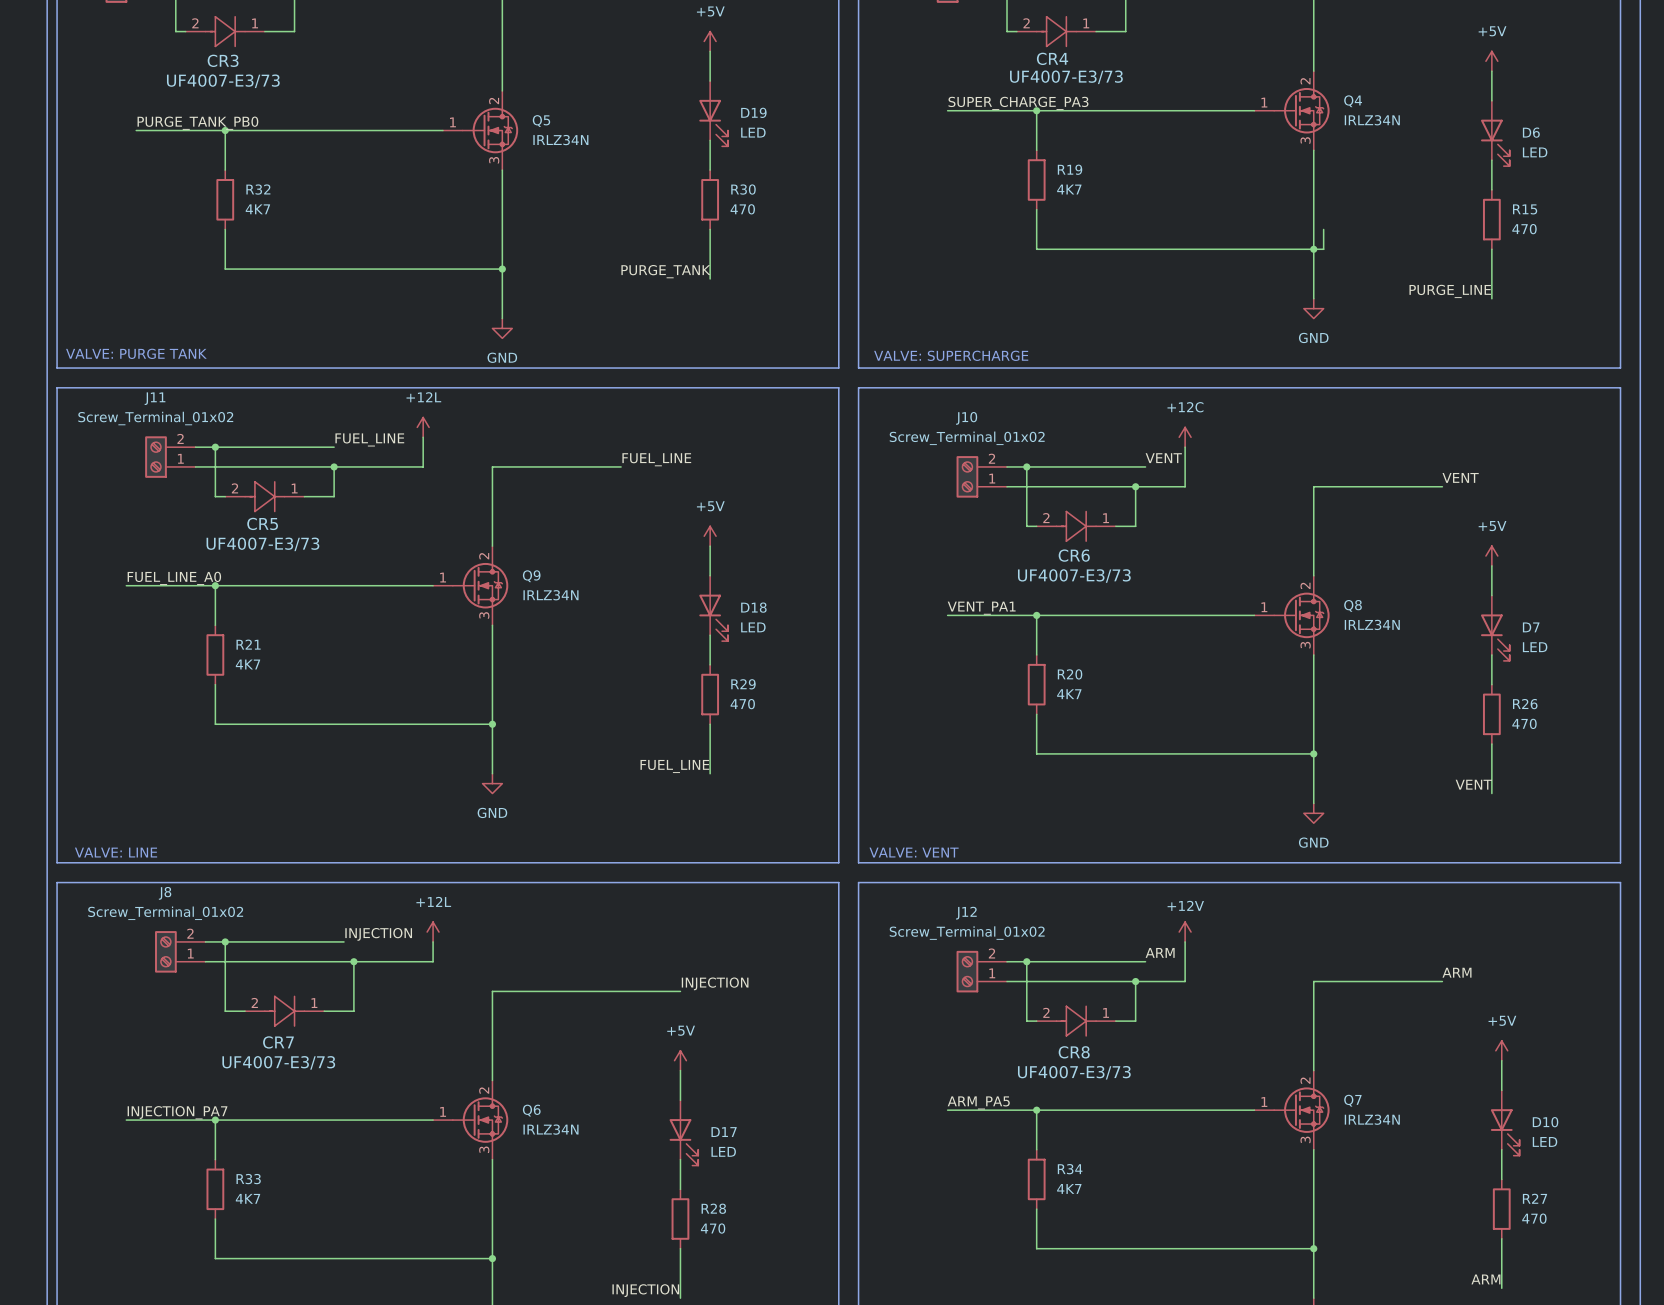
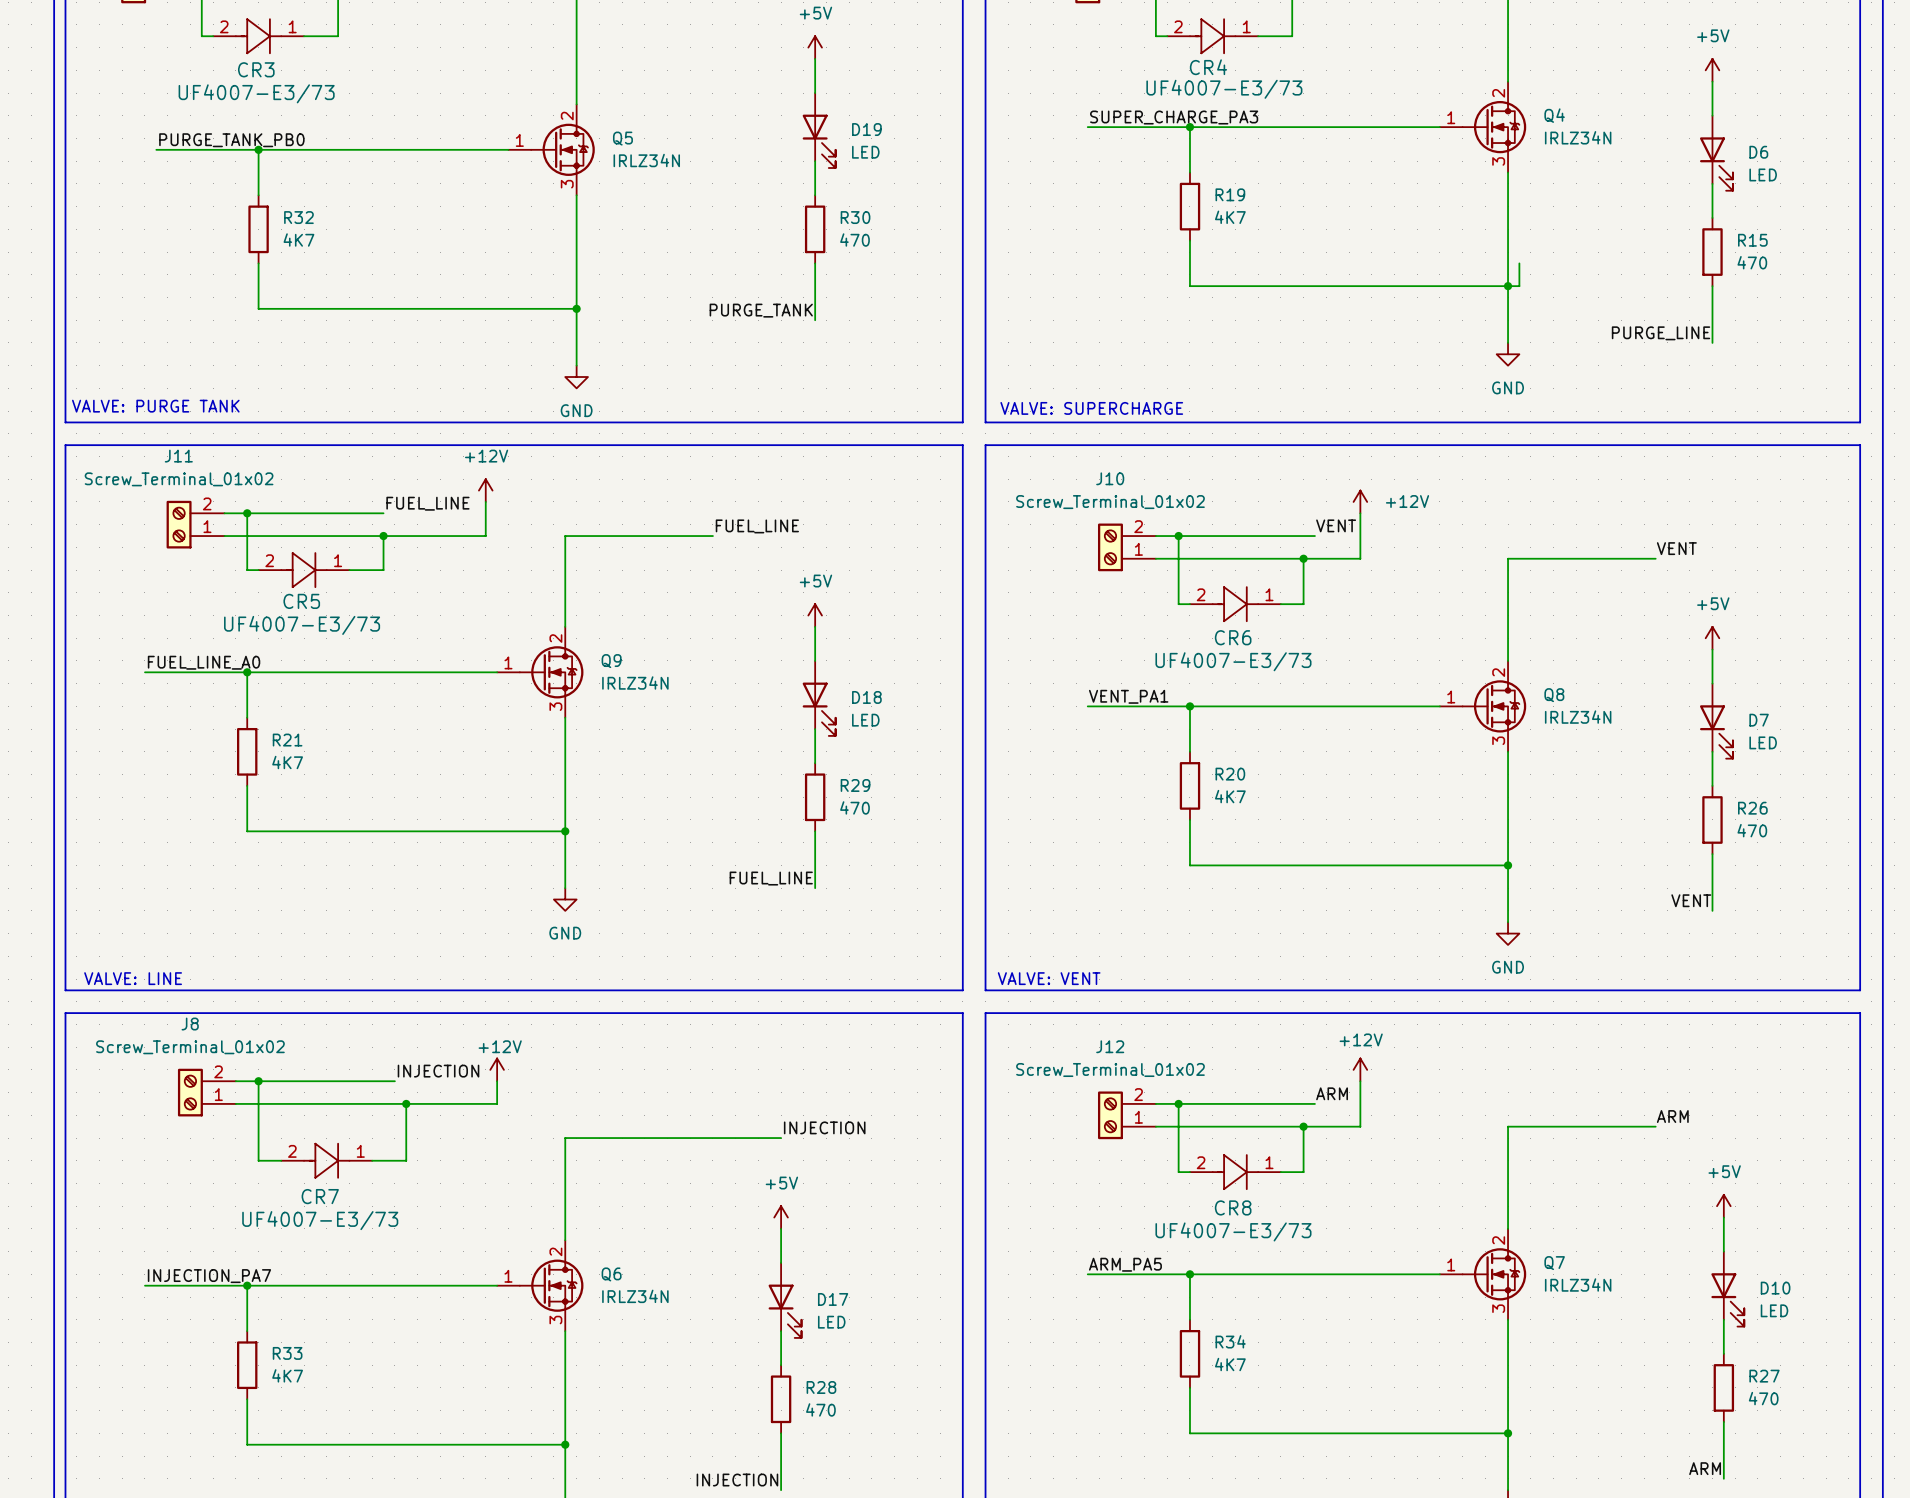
power symbol: +12L (423, 427) -> +12V (485, 490)
power symbol: +12C (1185, 437) -> +12V (1360, 501)
power symbol: +12L (433, 932) -> +12V (497, 1069)

